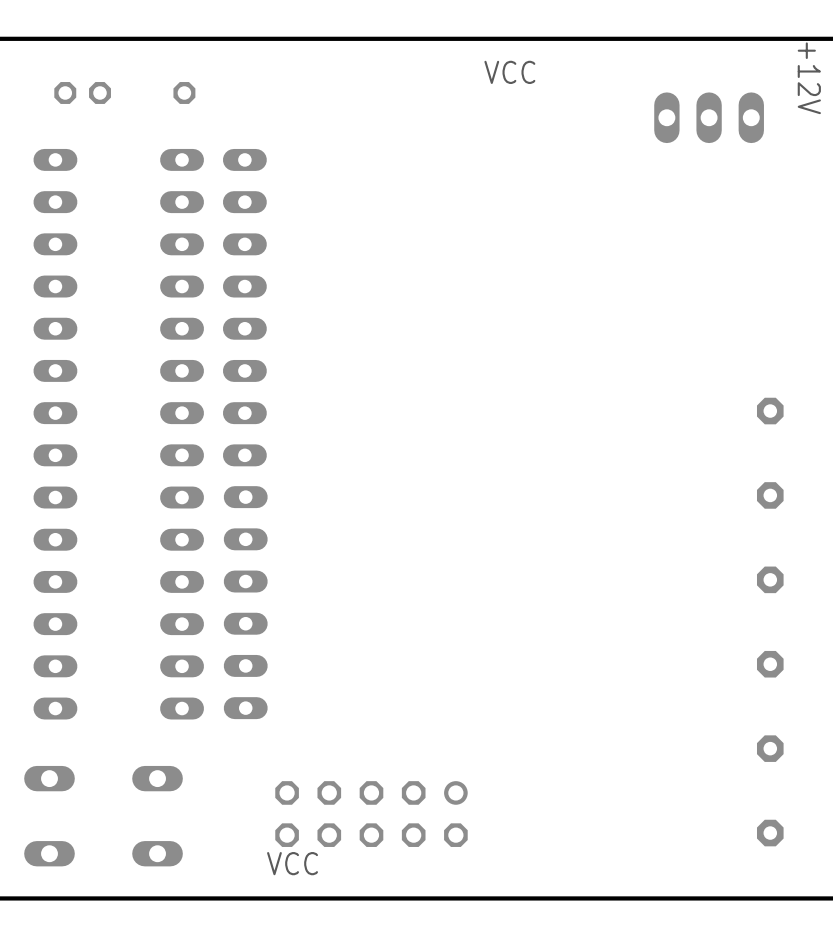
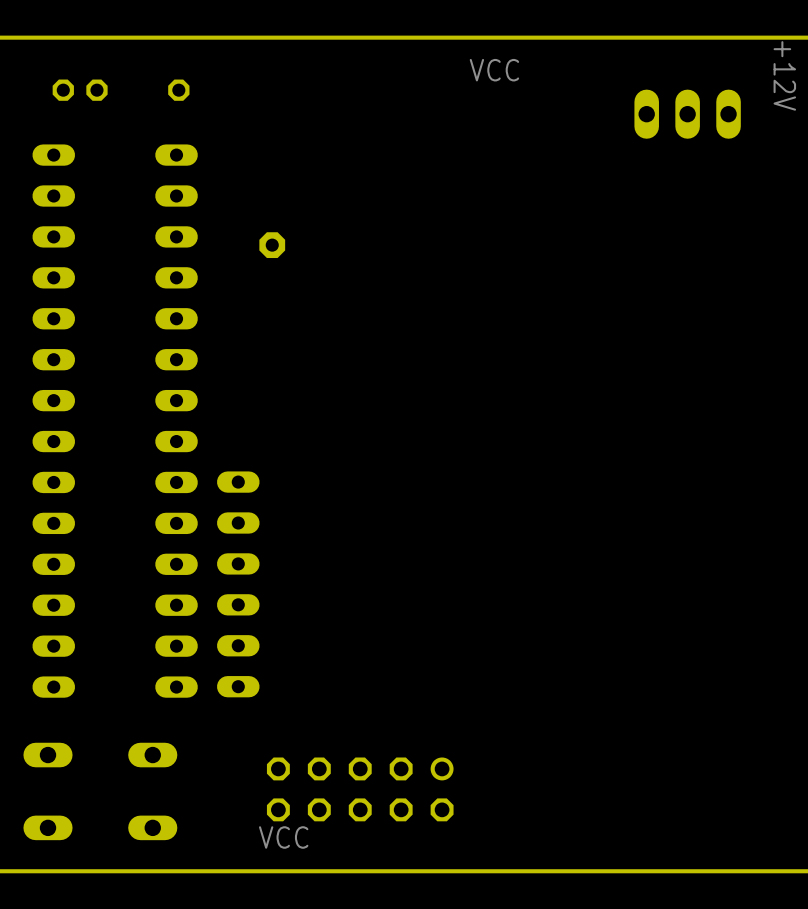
part: none -> (272, 245)
part: (244, 307) -> none
part: (770, 411) -> none
part: (770, 495) -> none
part: (770, 579) -> none
part: (770, 664) -> none
part: (770, 748) -> none
part: (770, 833) -> none

